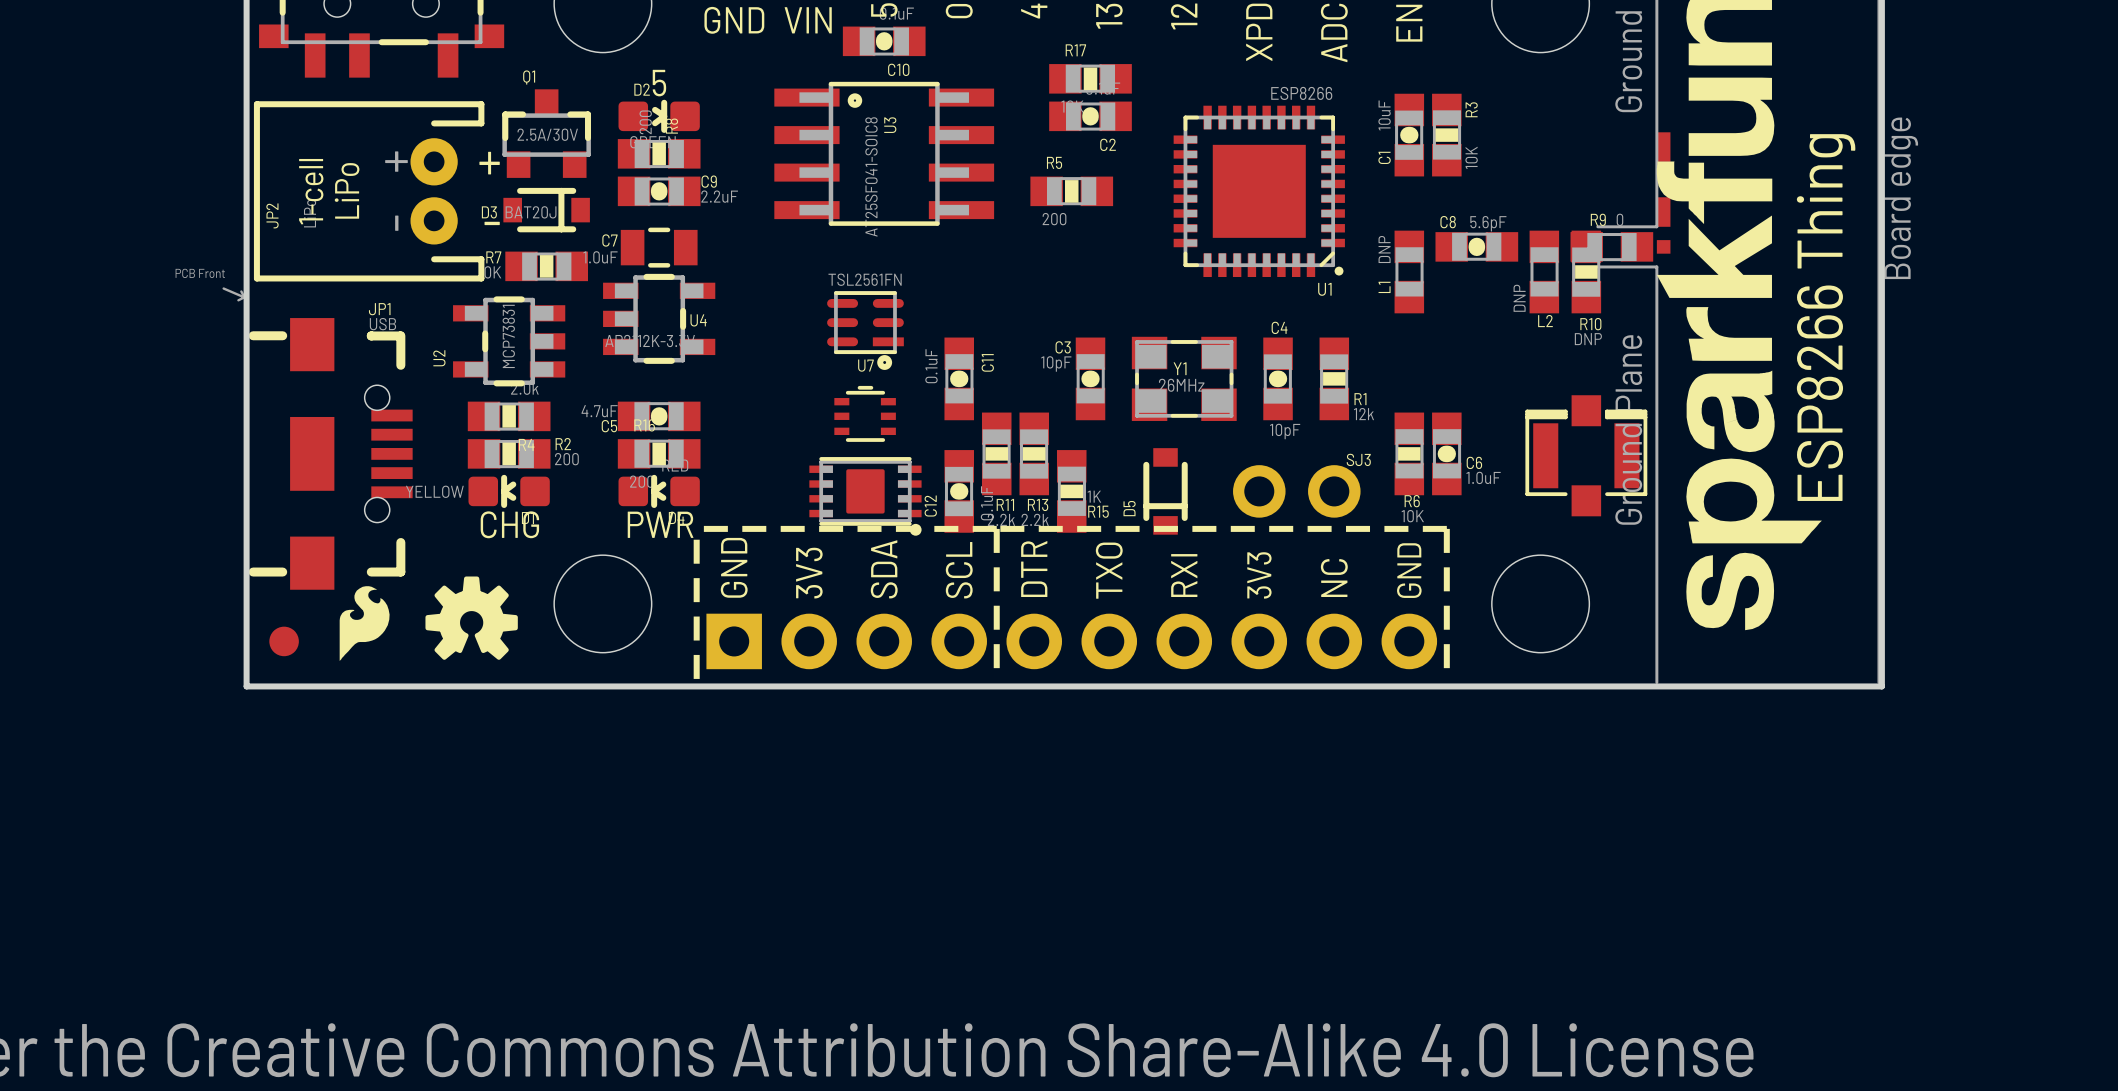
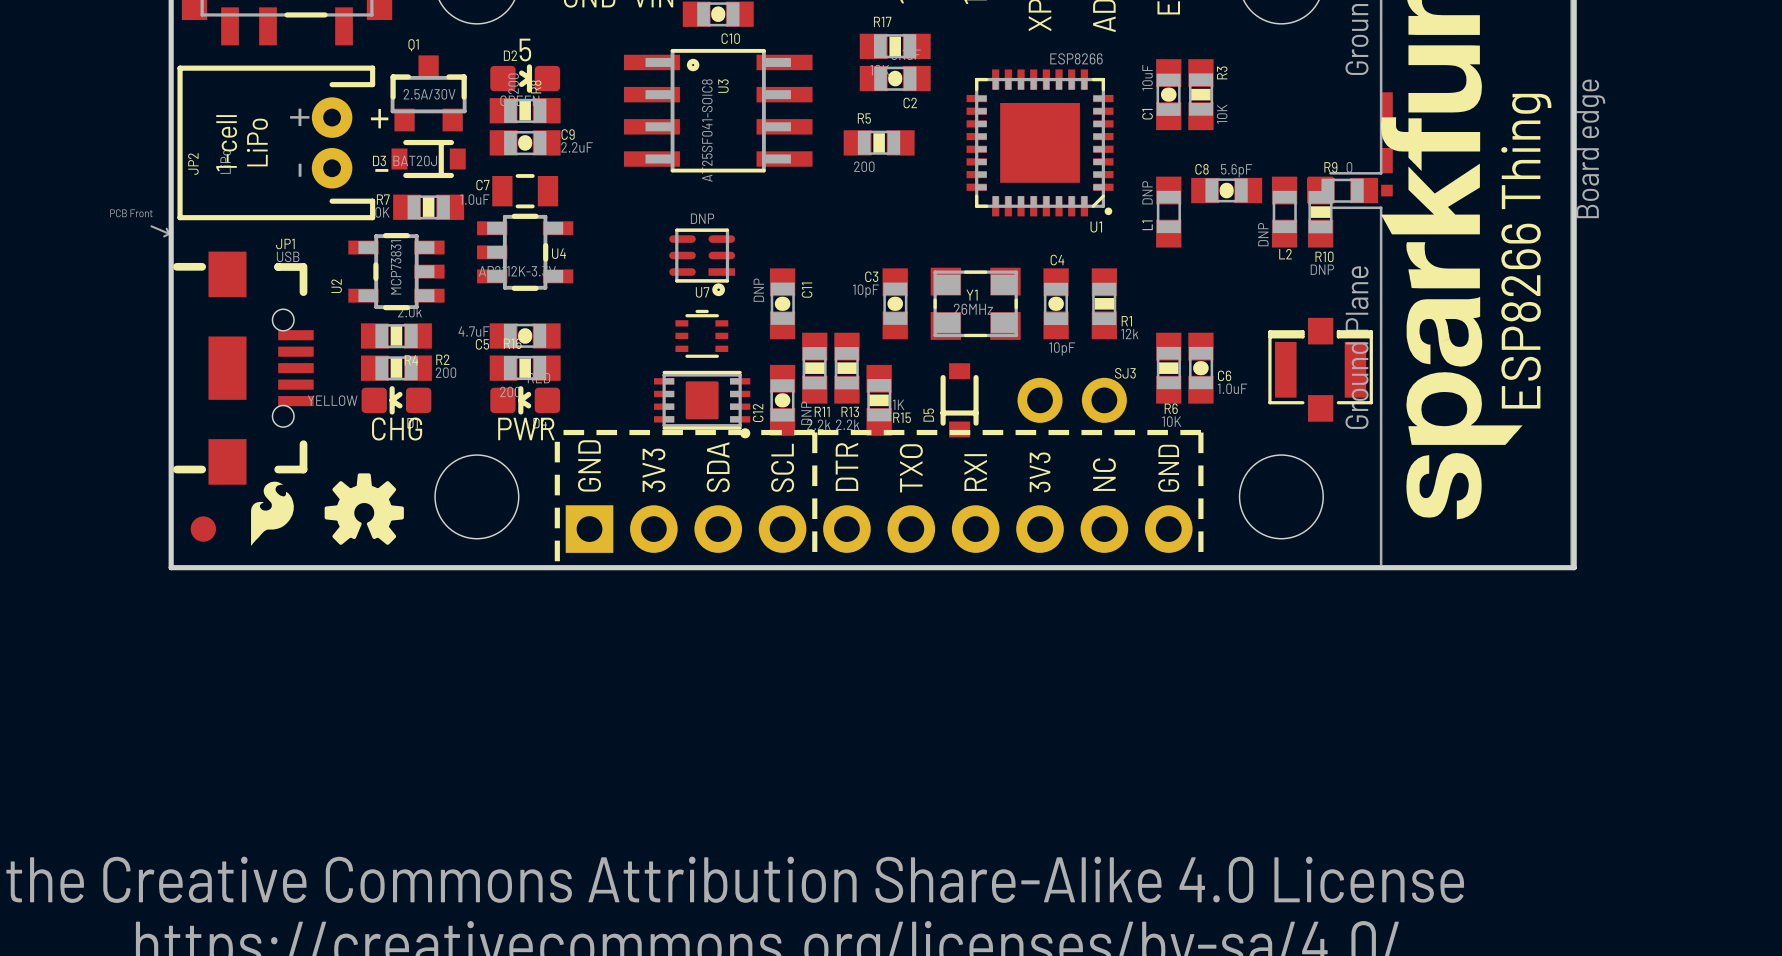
U7 value: TSL2561FN (865, 279) -> DNP (702, 218)
C11 value: 0.1uF (931, 366) -> DNP (758, 290)
C12 value: 0.1uF (986, 503) -> DNP (806, 413)

